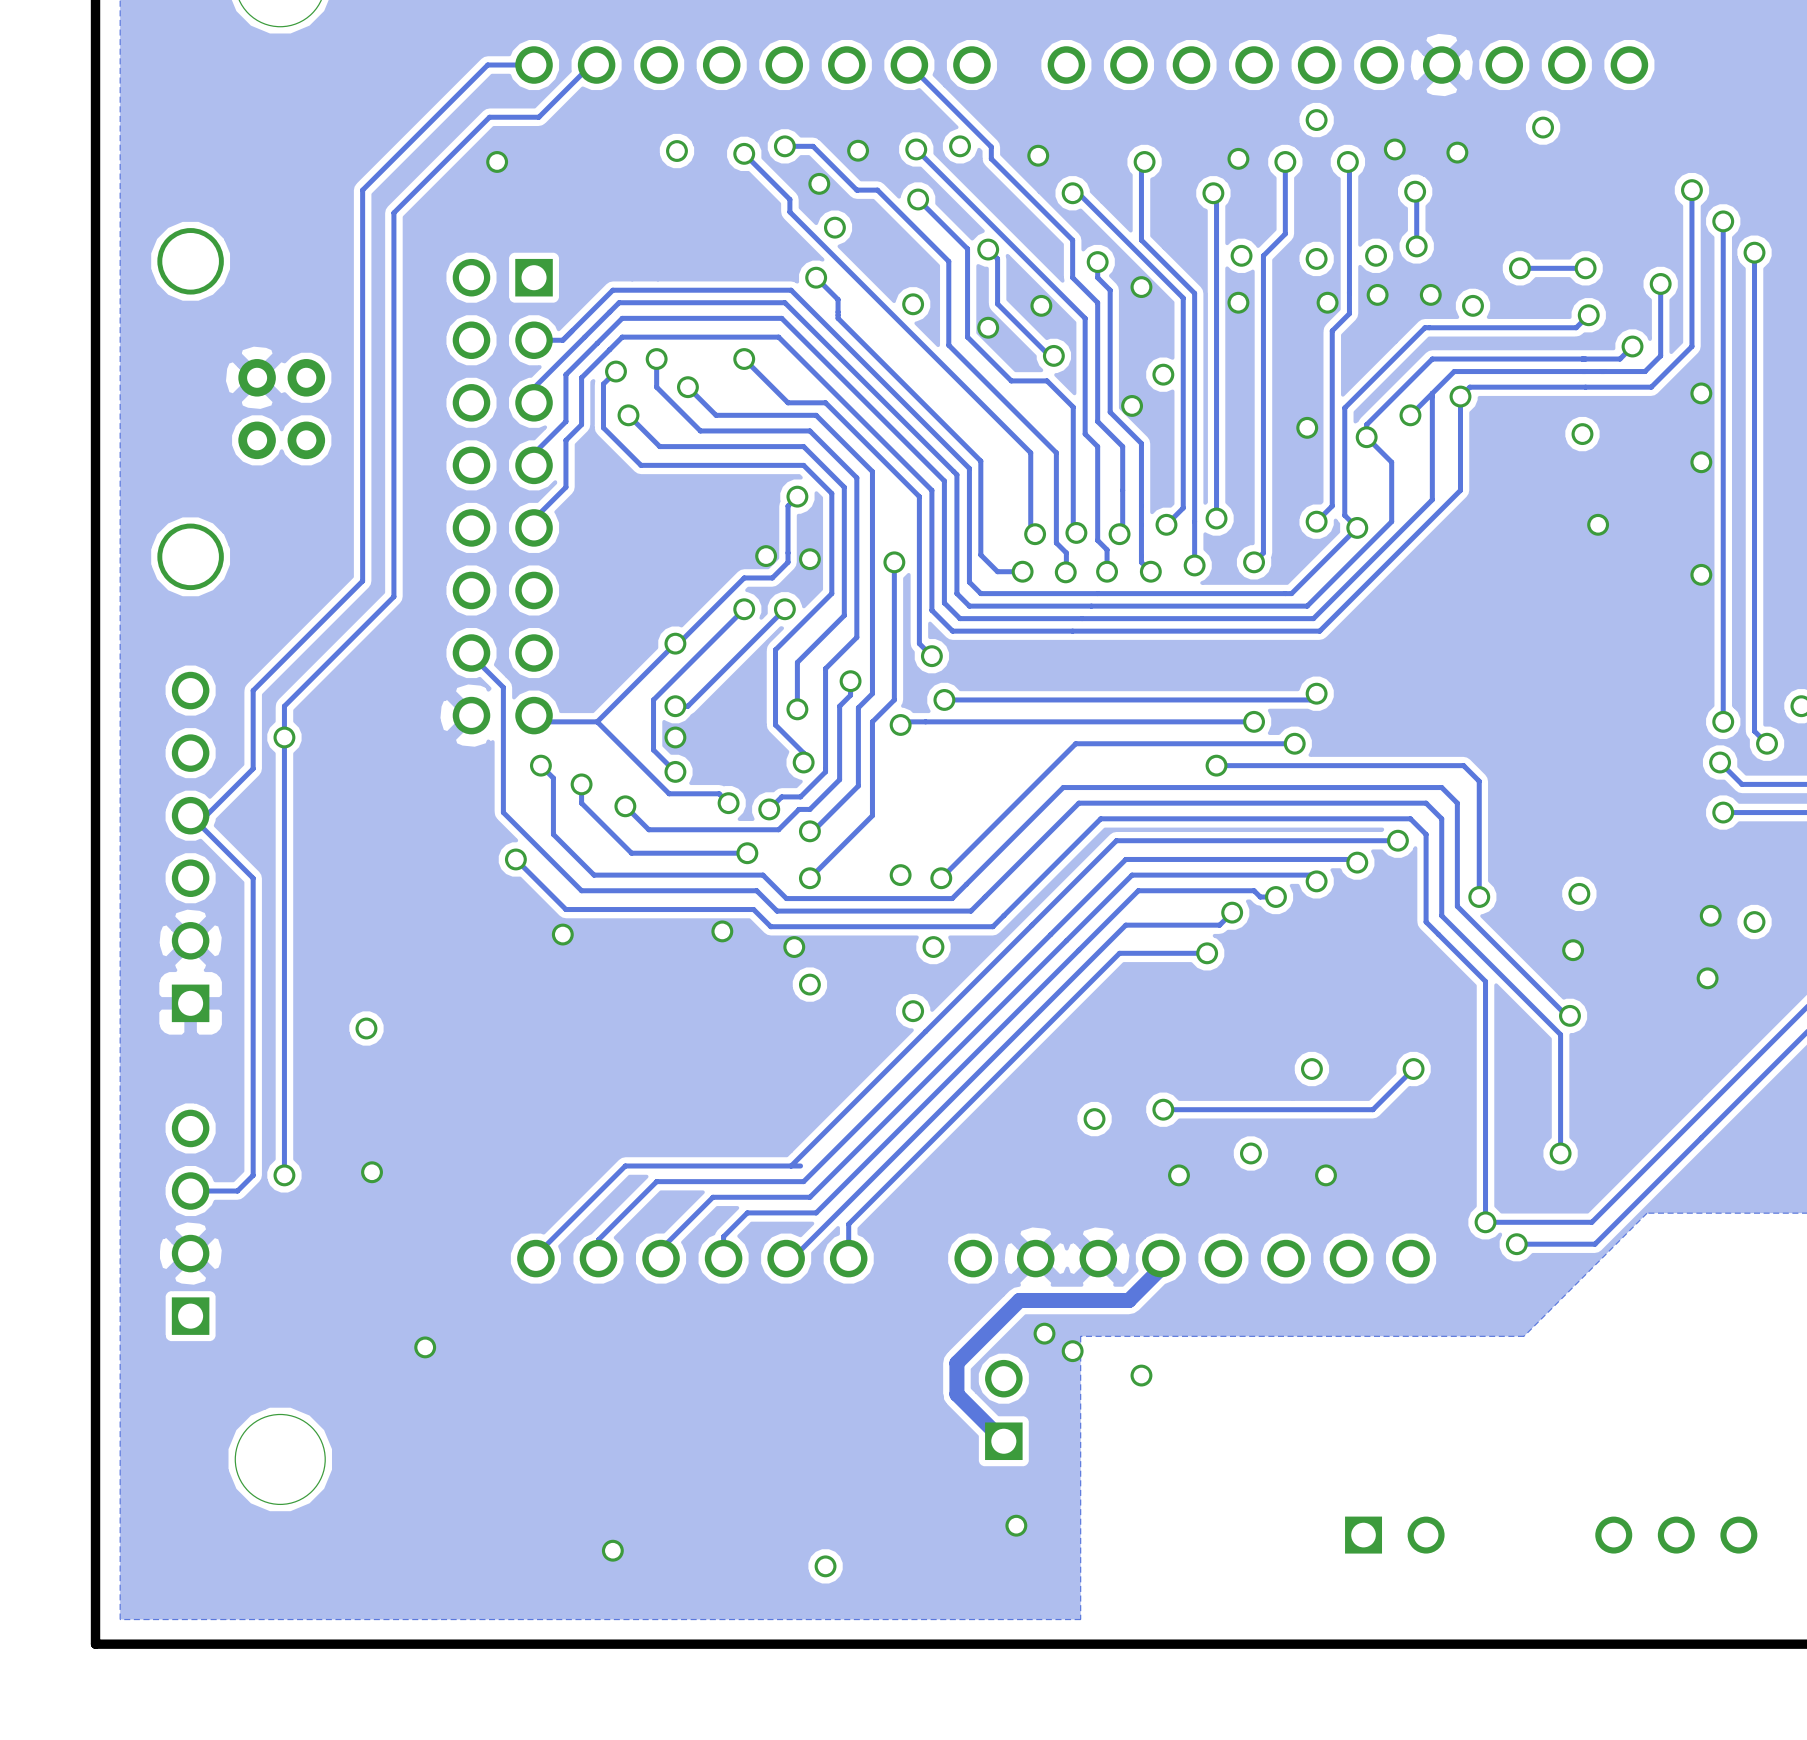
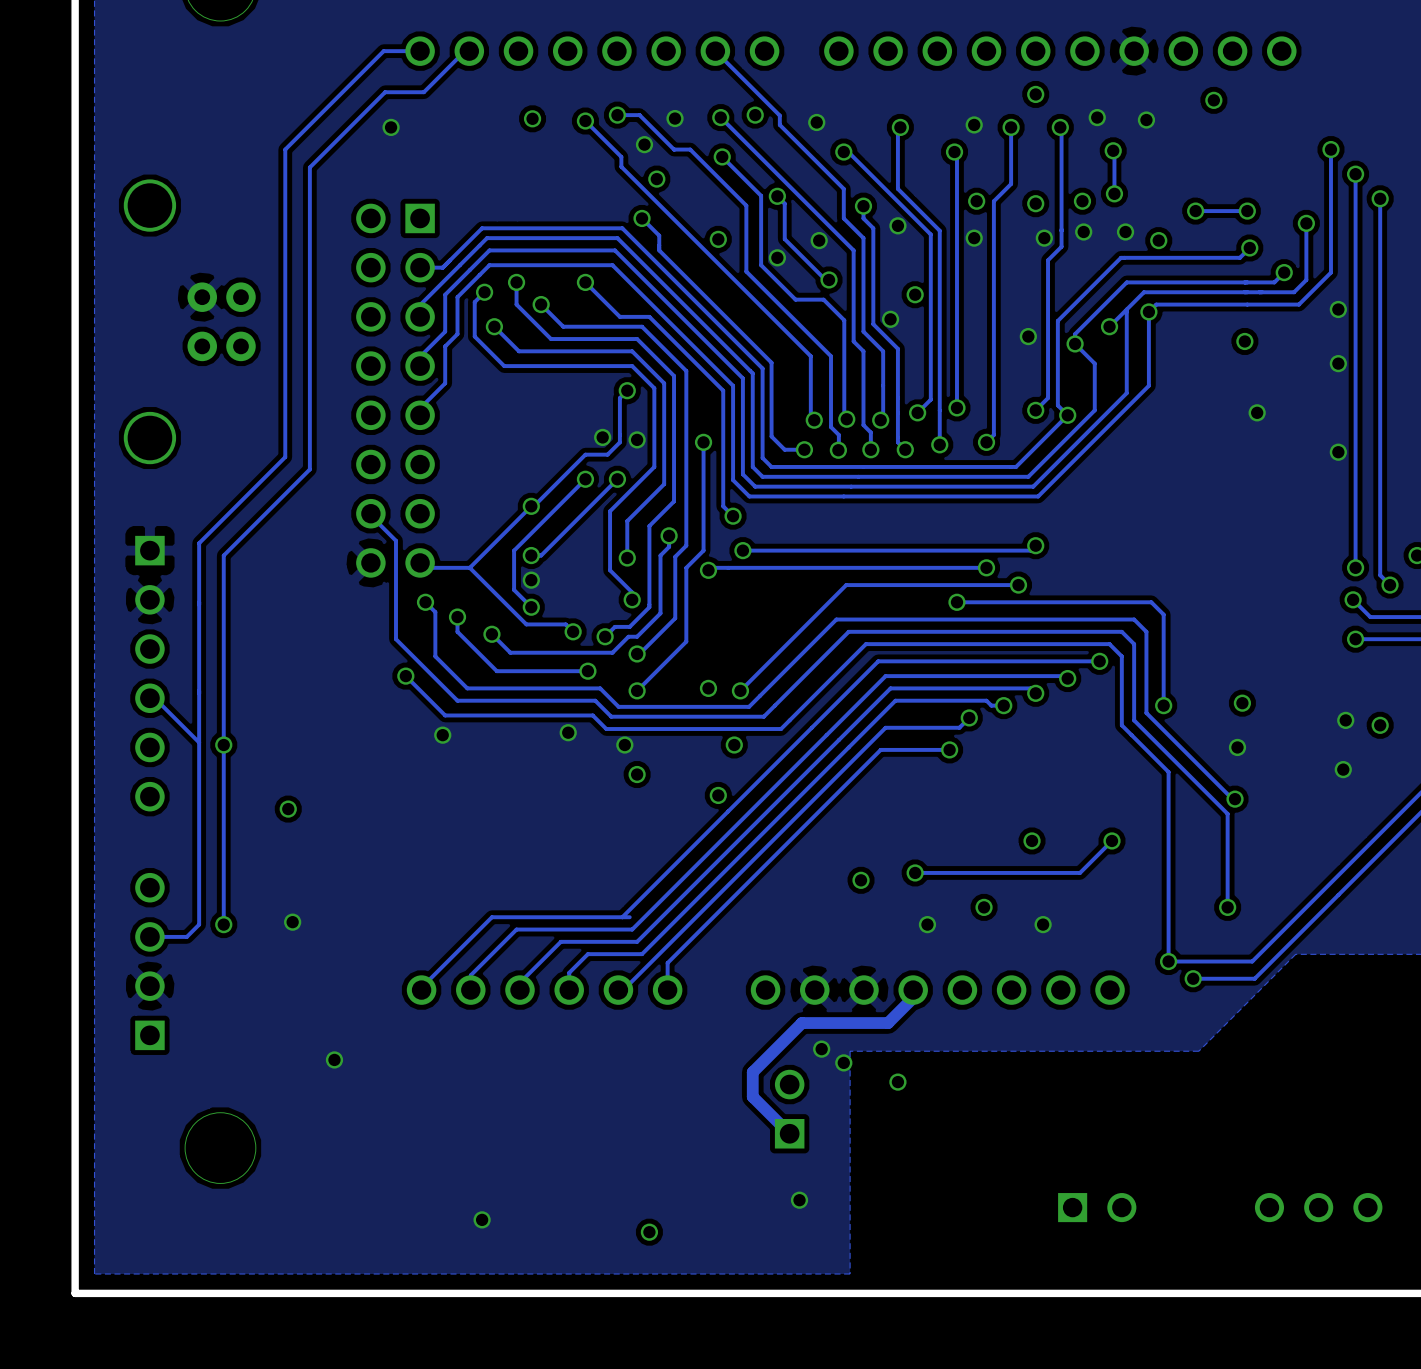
via: (284, 737) -> none
track: (253, 768) (206, 815) (190, 815) (253, 878) -> (199, 604) (199, 690)
part rotation: 0° (190, 846) -> 180° (149, 673)
track: none -> (149, 698) (154, 698) (199, 742)
via: none -> (223, 745)

